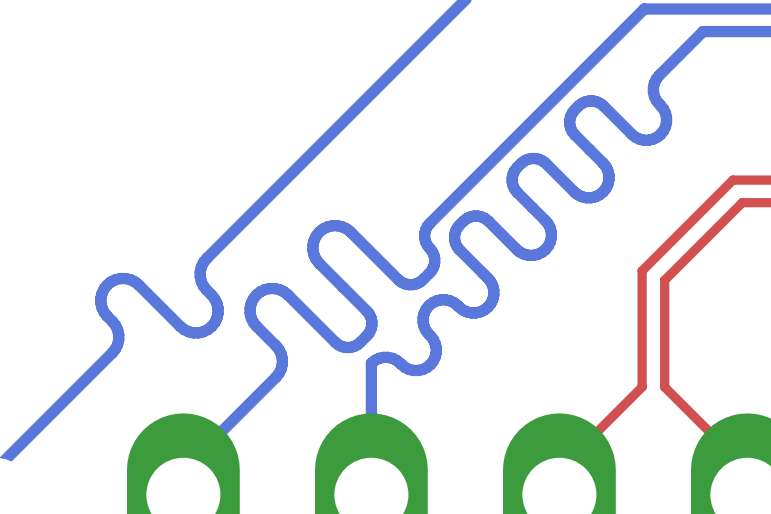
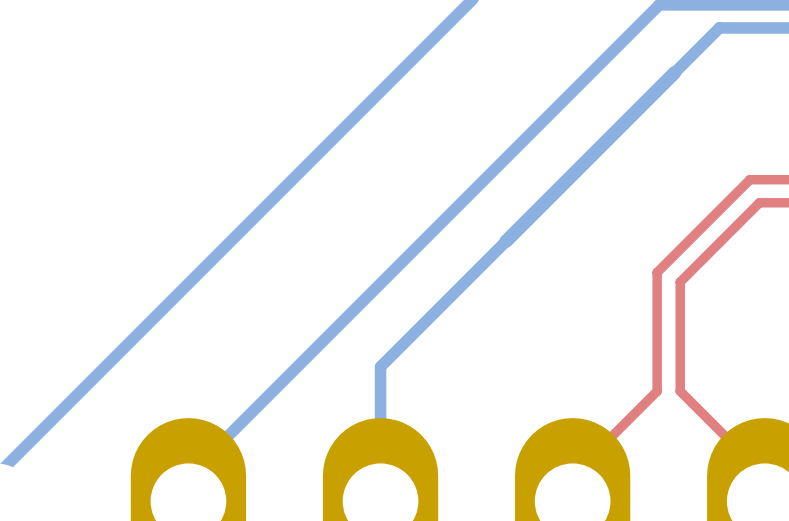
bottom track: (659, 75) (654, 83) (653, 92) (656, 100) (665, 113) (666, 122) (660, 134) (653, 139) (644, 140) (635, 137) (596, 101) (585, 101) (572, 112) (569, 120) (572, 131) (603, 163) (607, 170) (607, 184) (599, 194) (591, 197) (577, 194) (539, 159) (527, 159) (514, 170) (512, 177) (514, 189) (545, 220) (550, 228) (550, 241) (541, 252) (533, 255) (520, 252) (481, 217) (470, 217) (457, 228) (454, 235) (457, 246) (487, 278) (492, 285) (492, 299) (487, 307) (480, 311) (471, 312) (462, 309) (450, 300) (436, 300) (428, 305) (423, 317) (424, 326) (433, 339) (436, 347) (435, 356) (430, 364) (422, 369) (413, 370) (388, 357) (379, 358) (371, 363) -> (674, 72) (380, 366)
bottom track: (429, 223) (425, 230) (424, 237) (433, 254) (433, 266) (423, 279) (412, 284) (404, 283) (398, 279) (346, 228) (332, 225) (323, 228) (316, 235) (312, 245) (316, 259) (366, 311) (371, 317) (371, 325) (369, 332) (353, 346) (345, 347) (338, 344) (284, 291) (269, 288) (256, 294) (250, 308) (251, 317) (281, 354) (282, 363) (275, 377) -> (440, 224) (283, 381)
bottom track: (206, 258) (200, 271) (201, 281) (214, 298) (218, 308) (216, 318) (211, 326) (198, 332) (184, 329) (134, 281) (125, 278) (115, 279) (107, 284) (100, 298) (104, 312) (115, 325) (118, 334) (117, 344) (112, 352) -> (212, 259) (115, 356)

